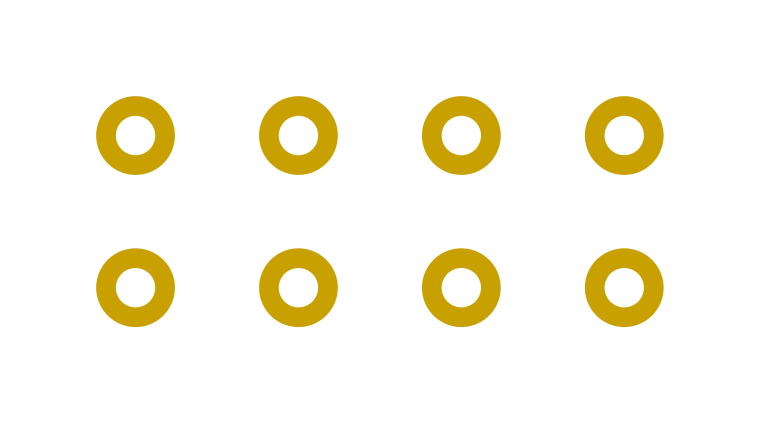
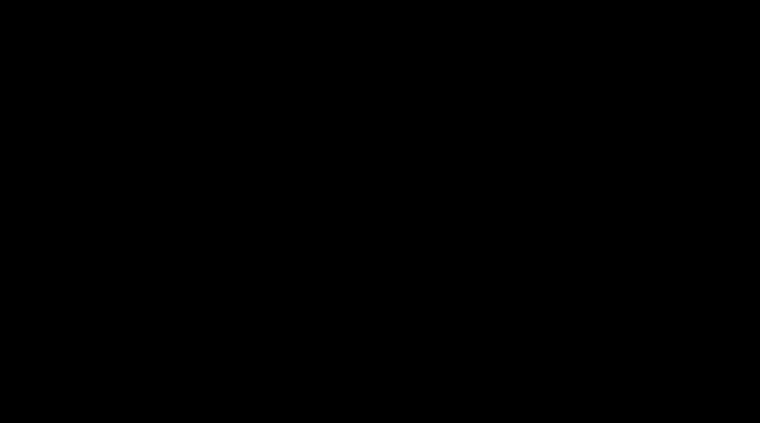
part: (135, 135) -> none
part: (298, 135) -> none
part: (461, 135) -> none
part: (624, 135) -> none
part: (135, 287) -> none
part: (298, 287) -> none
part: (461, 287) -> none
part: (624, 287) -> none

